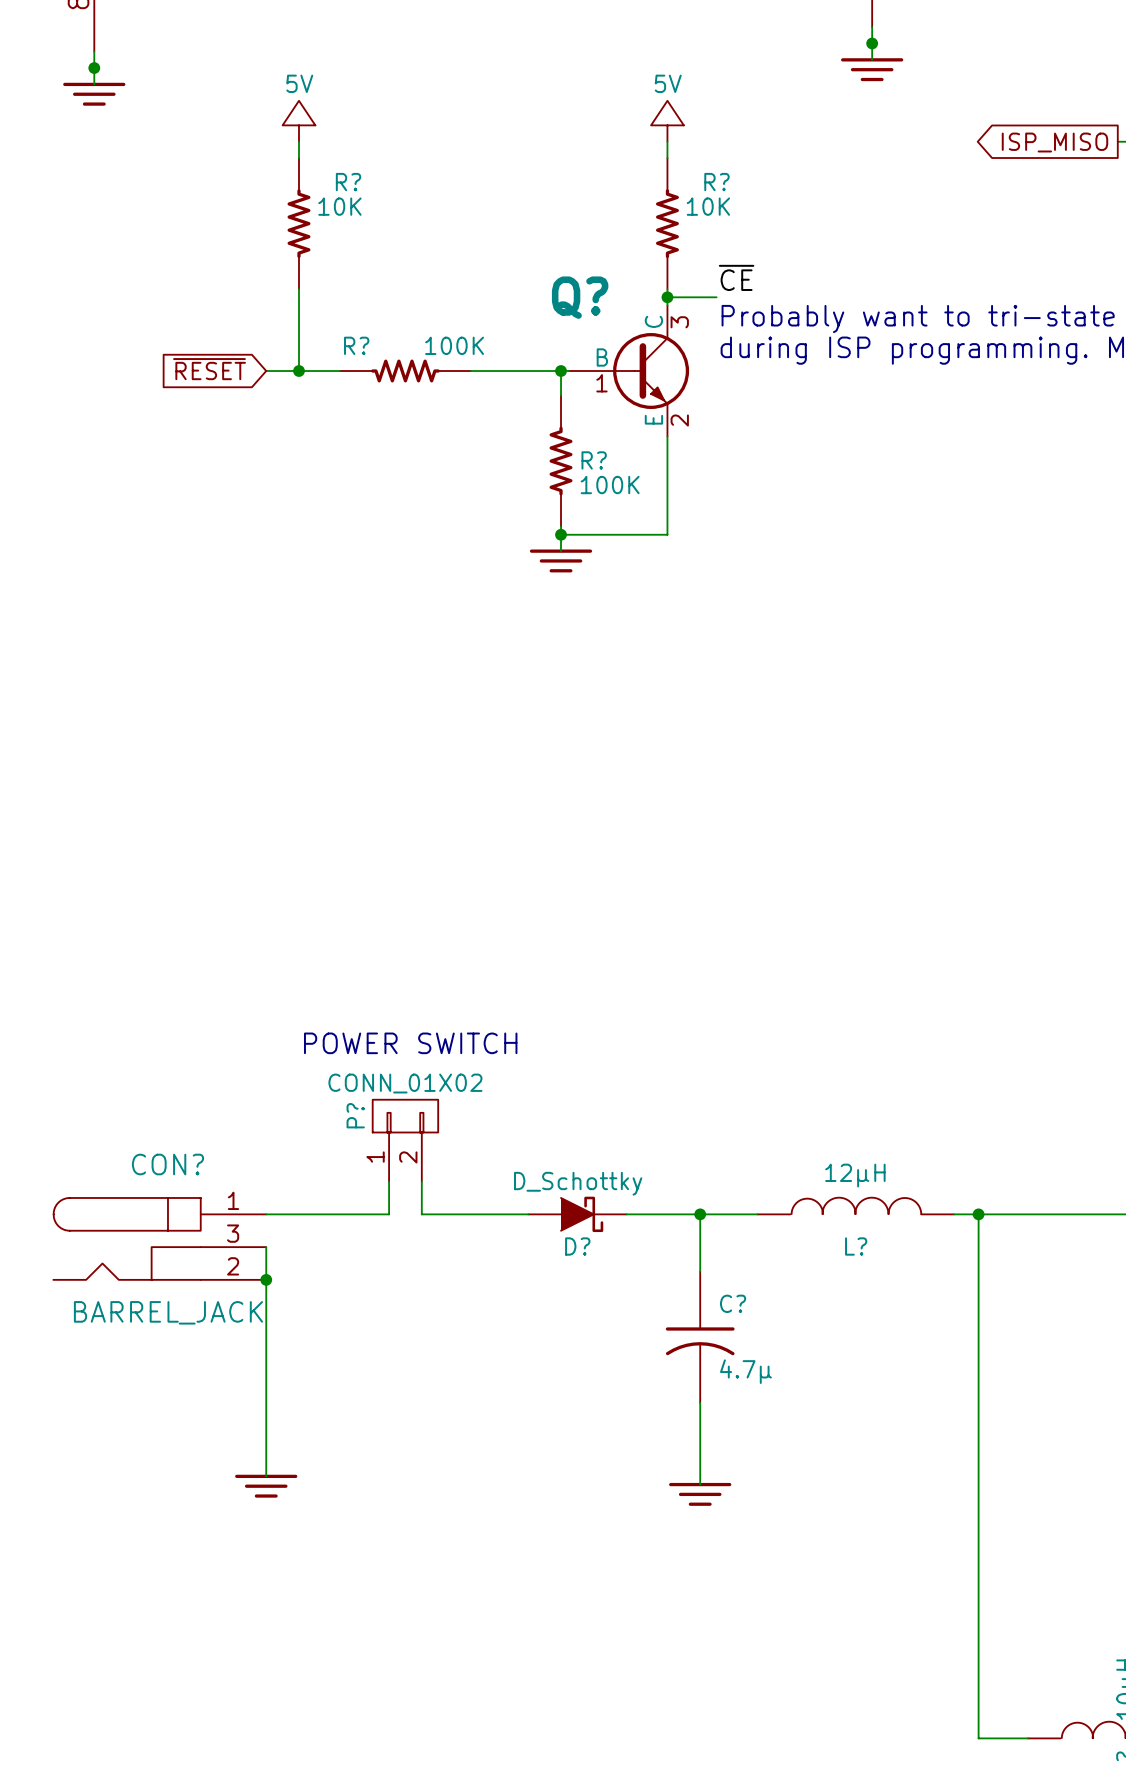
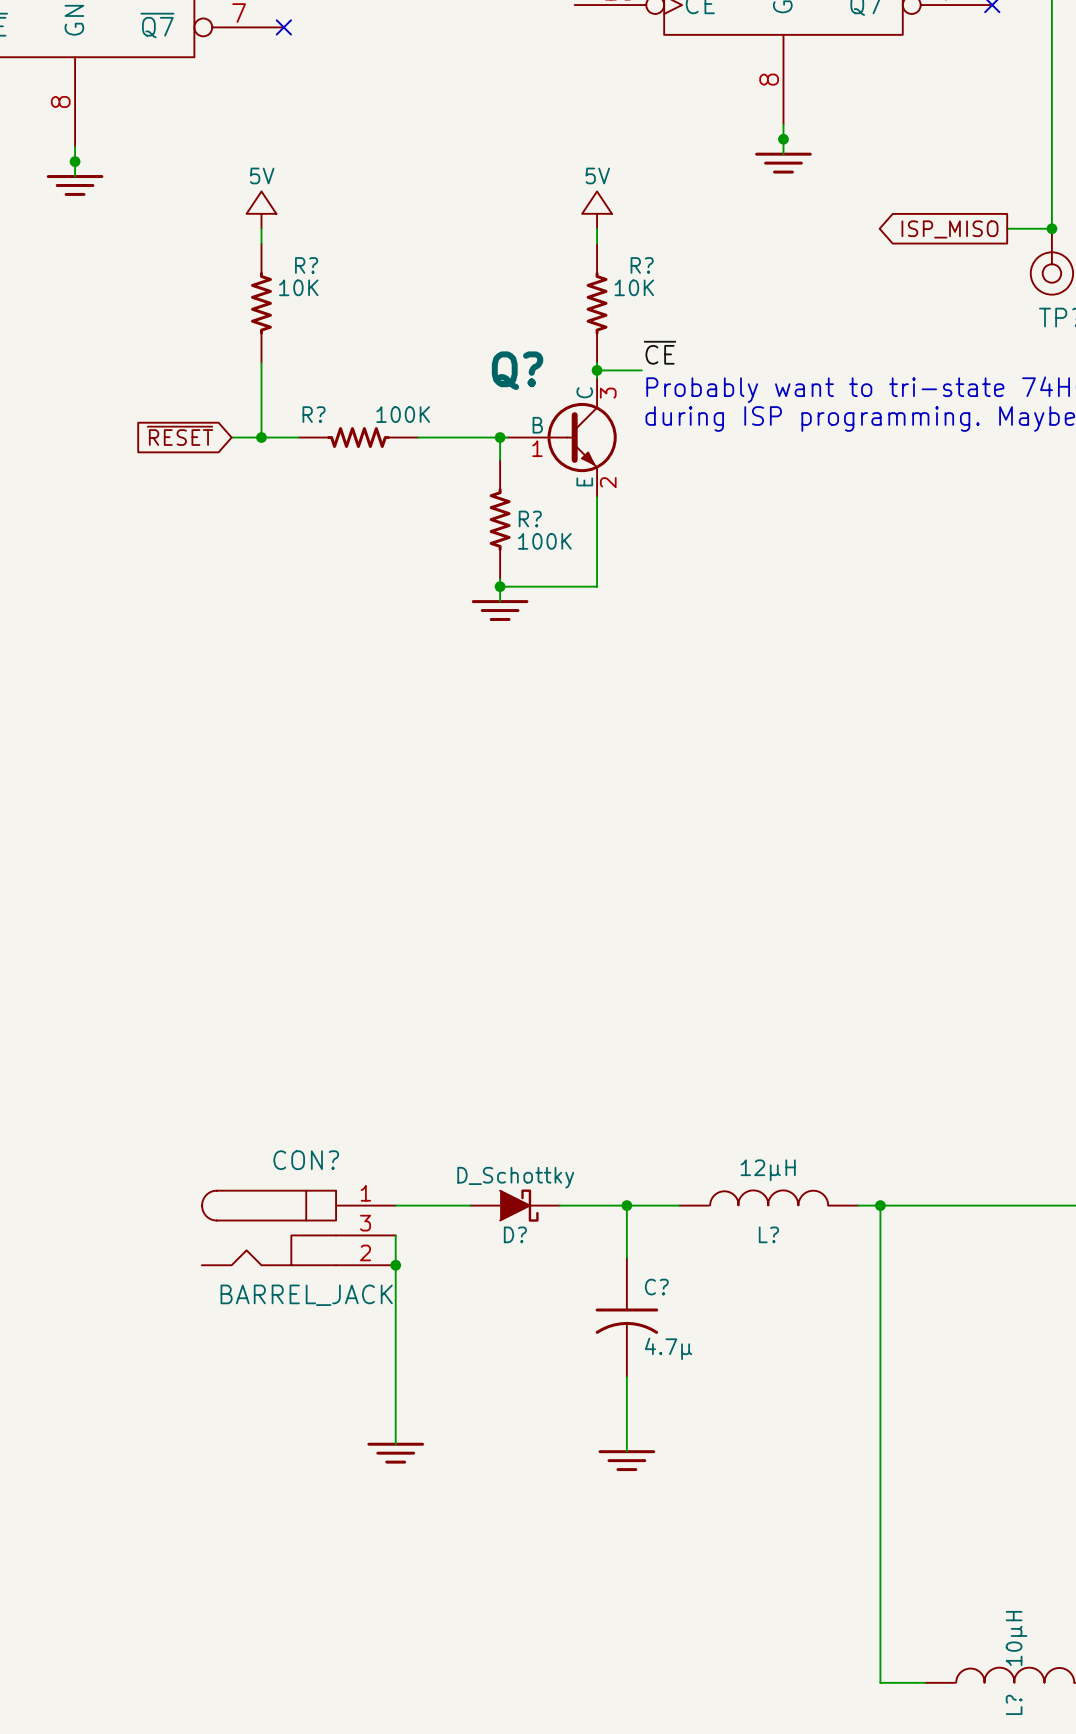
text: POWER SWITCH (410, 1043) -> none
P?: CONN_01X02 (405, 1140) -> none
wire: (389, 1181) (389, 1214) (266, 1214) -> none
wire: (421, 1181) (421, 1214) (446, 1214) -> none
CON? position: (159, 1238) -> (298, 1227)
wire: (266, 1247) (266, 1476) -> (395, 1235) (395, 1444)
junction: (266, 1279) -> none
junction: none -> (395, 1265)
power symbol position: (266, 1486) -> (395, 1453)

